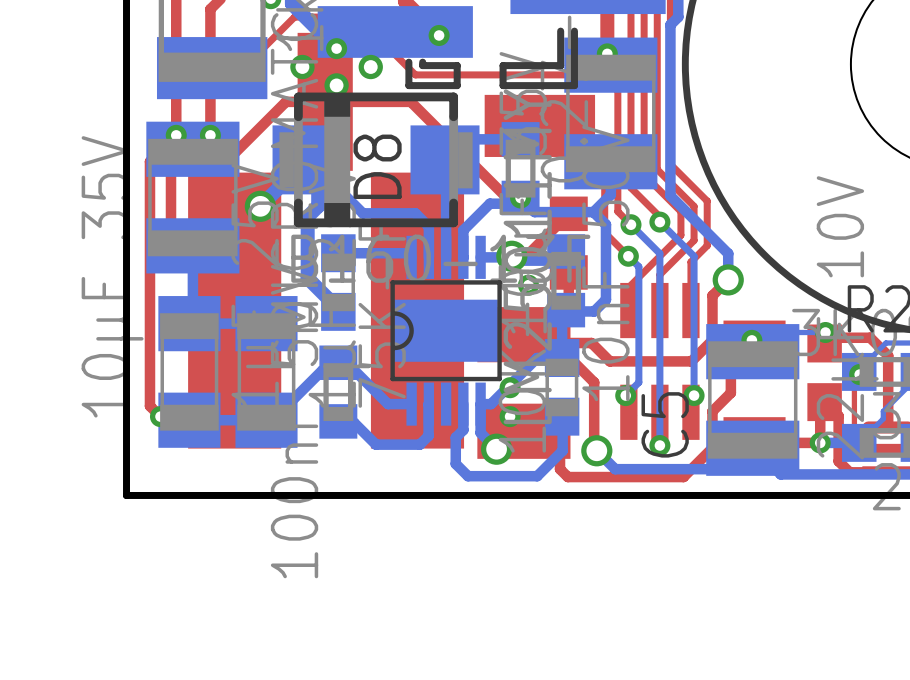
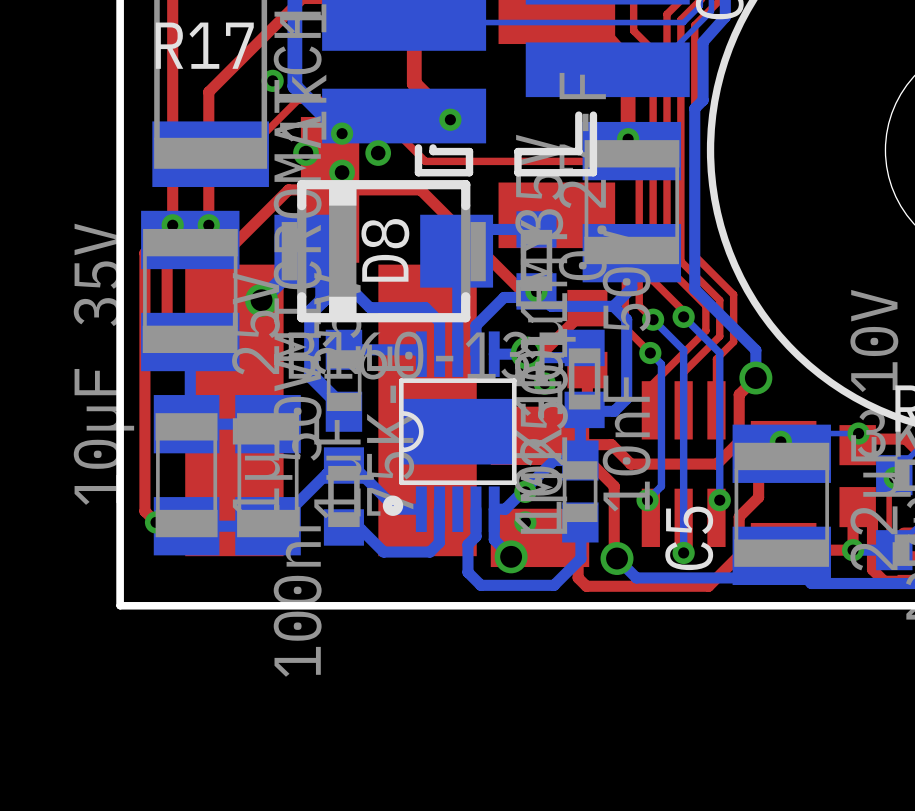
part footprint: [390, 235, 502, 426] -> [382, 331, 517, 532]

